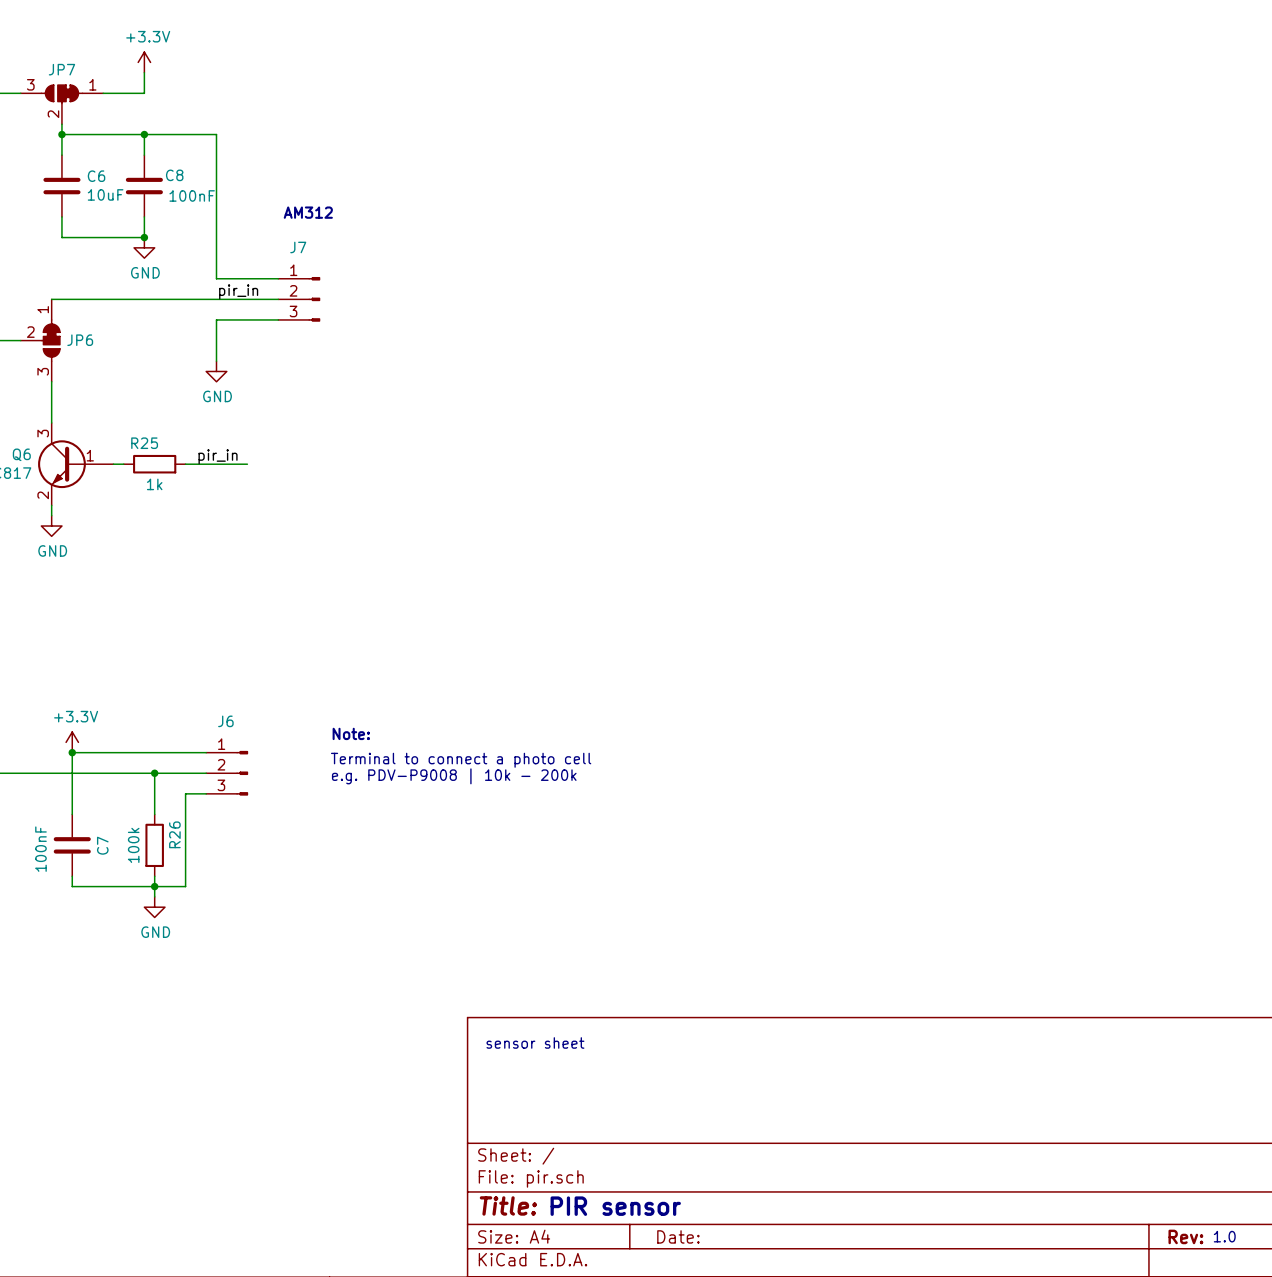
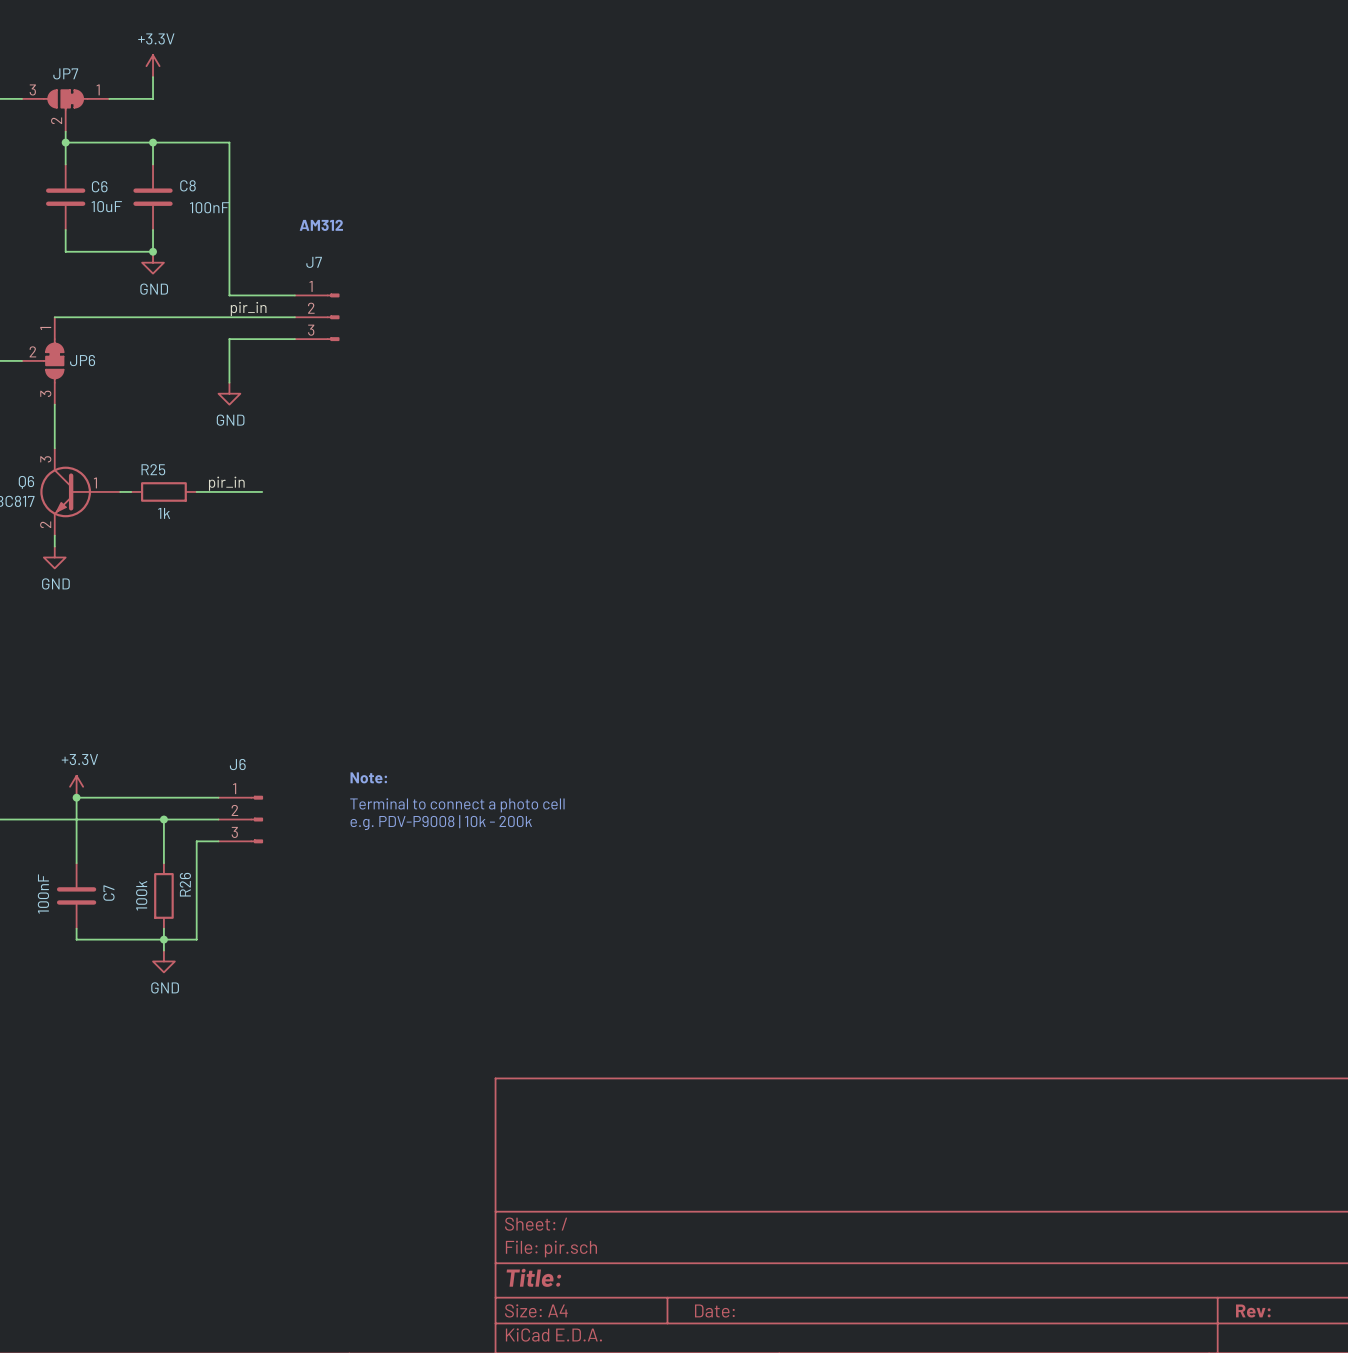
text: sensor sheet (535, 1042) -> none
text: PIR sensor (615, 1206) -> none
text: 1.0 (1224, 1236) -> none

